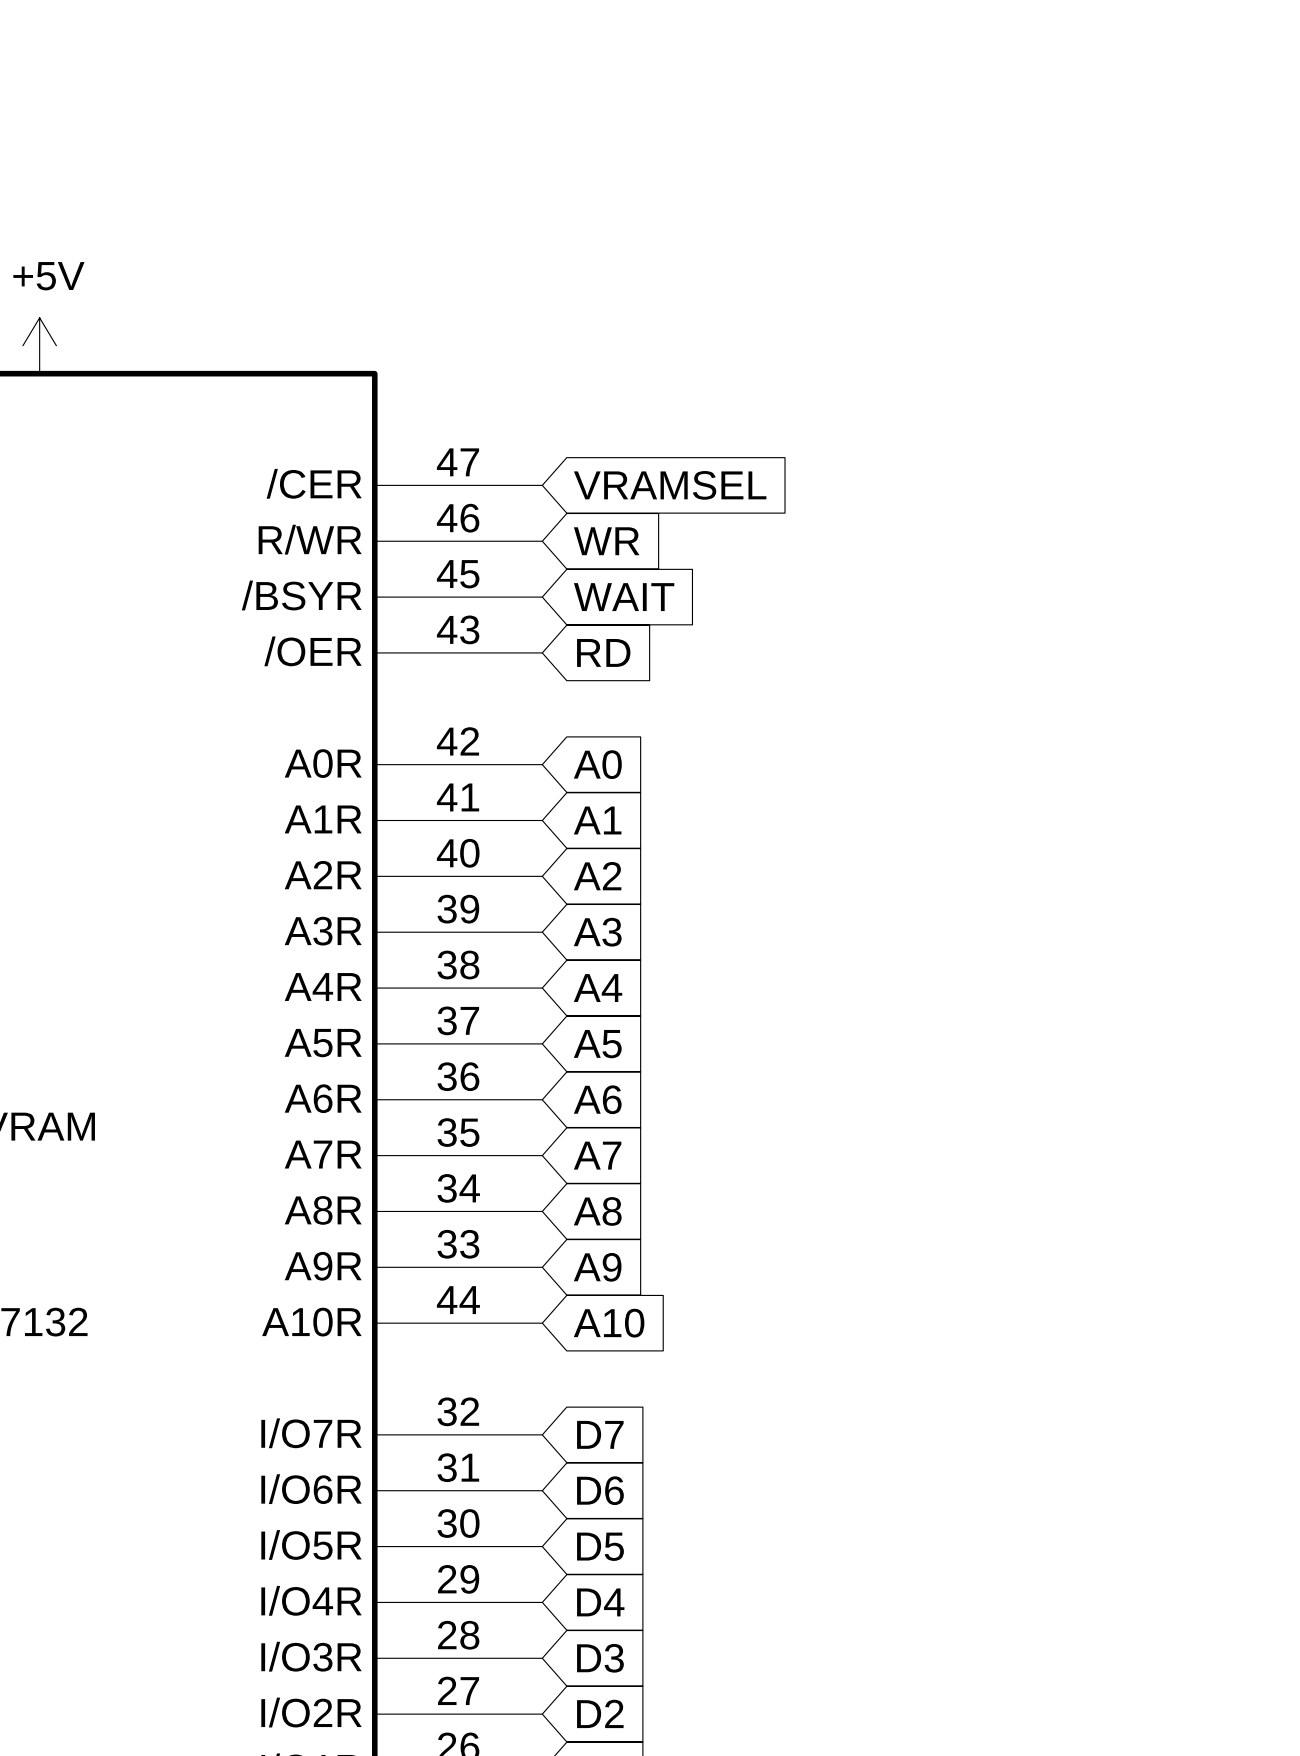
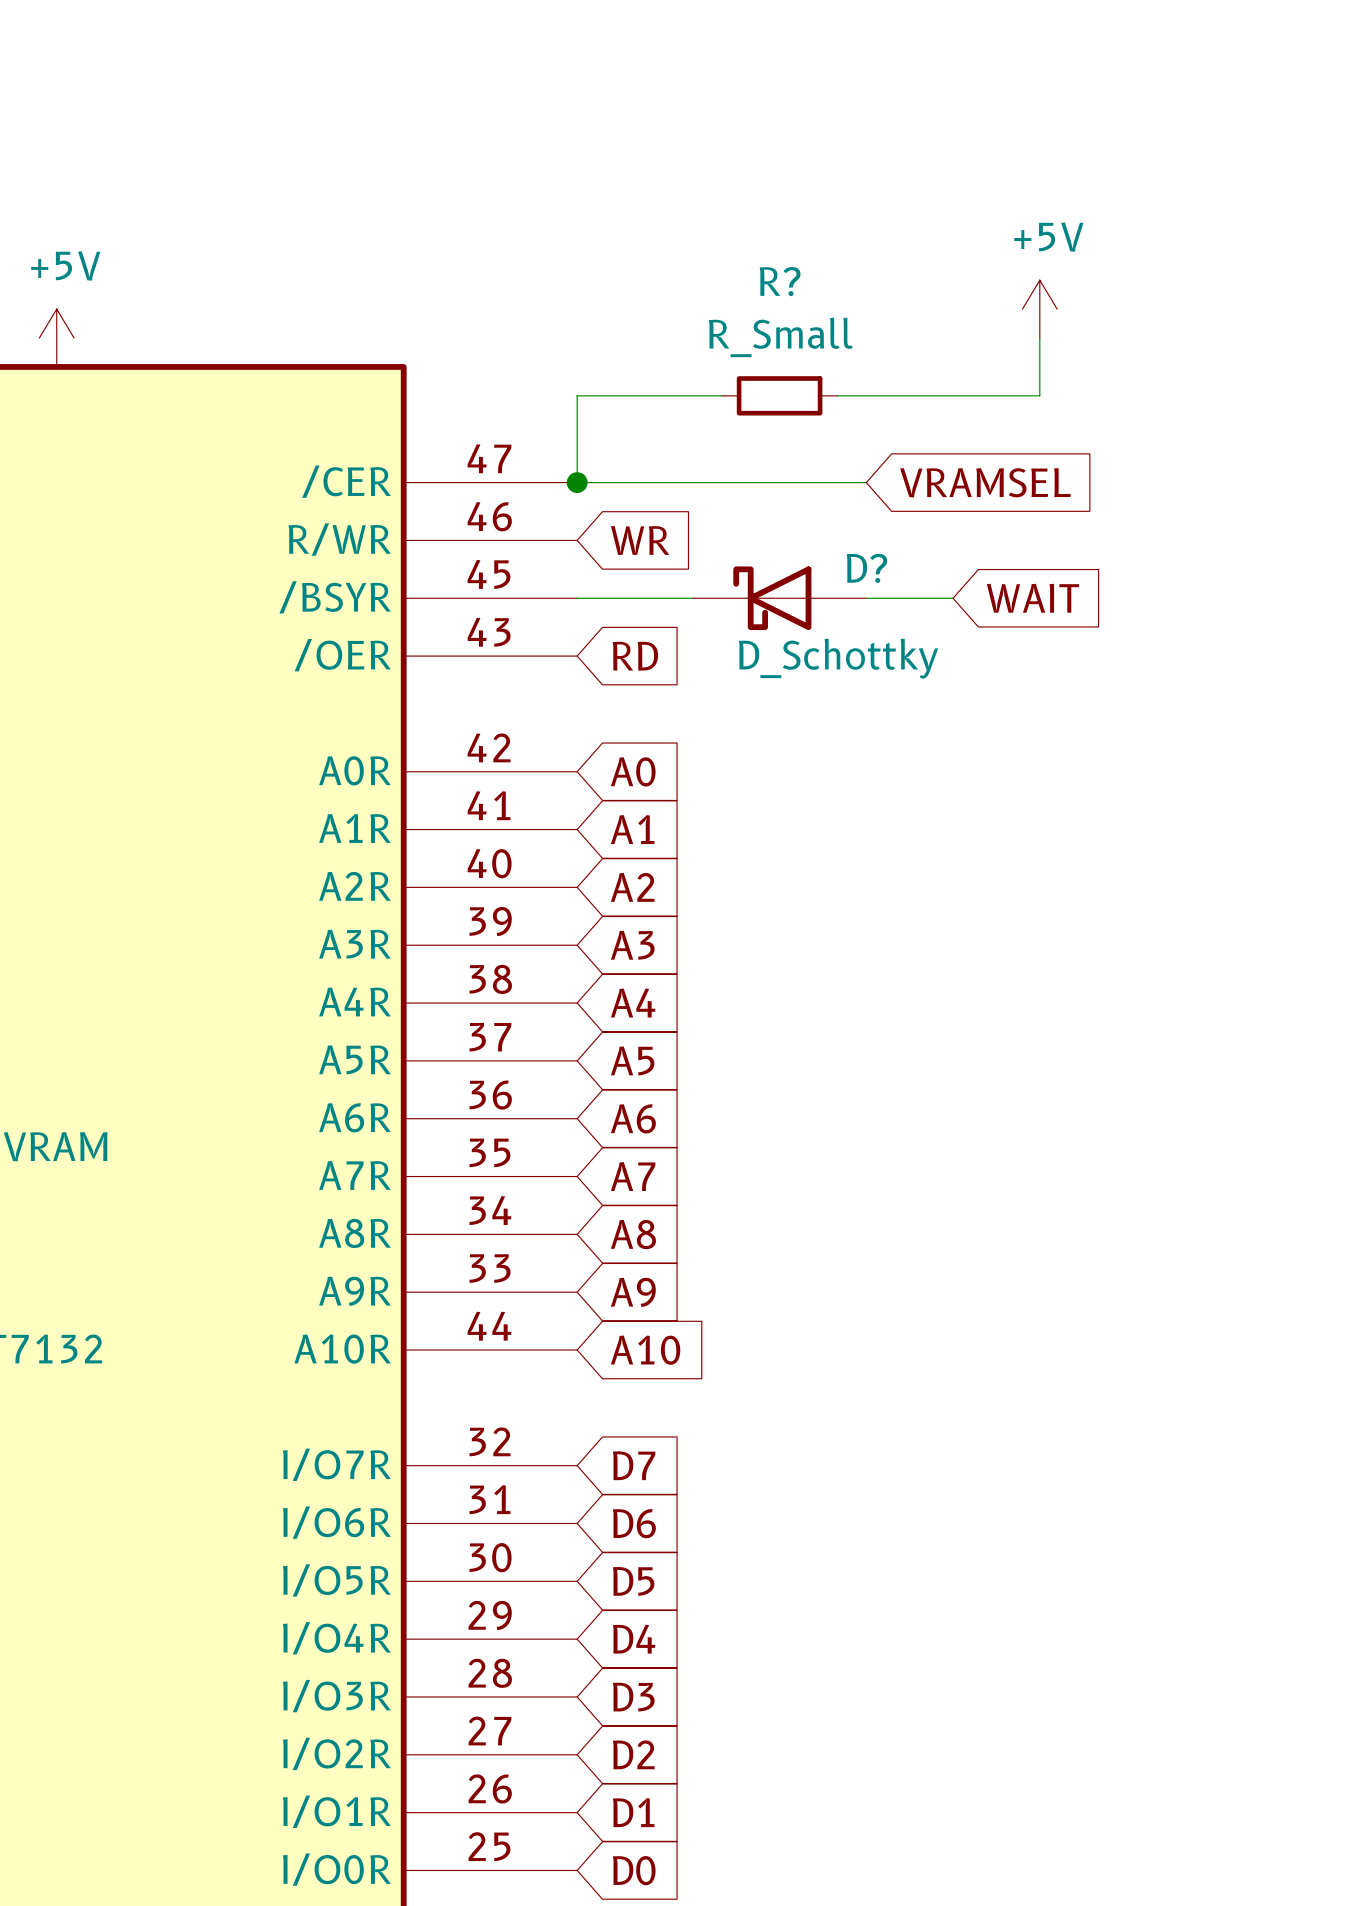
power symbol: none -> +5V (1039, 309)
wire: none -> (1039, 338) (1039, 395) (837, 395)
wire: none -> (721, 395) (577, 395) (577, 482) (866, 482)
R?: none -> R_Small (779, 395)
junction: none -> (577, 482)
global label position: VRAMSEL (670, 485) -> VRAMSEL (985, 482)
wire: none -> (577, 598) (692, 598)
global label position: WAIT (624, 597) -> WAIT (1032, 598)
D?: none -> D_Schottky (779, 598)
wire: none -> (866, 598) (953, 598)

